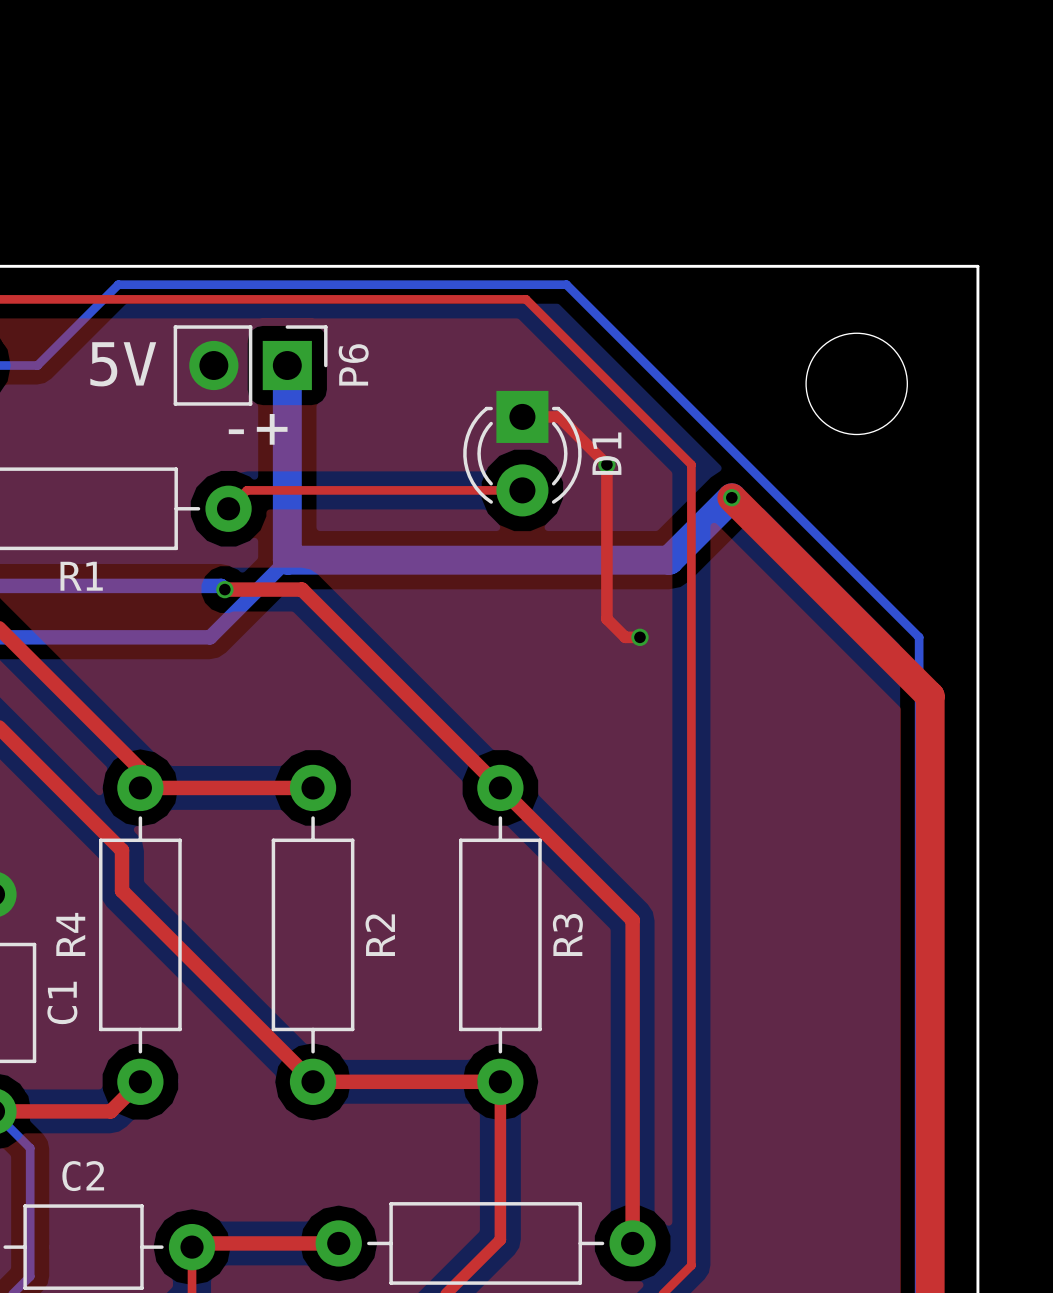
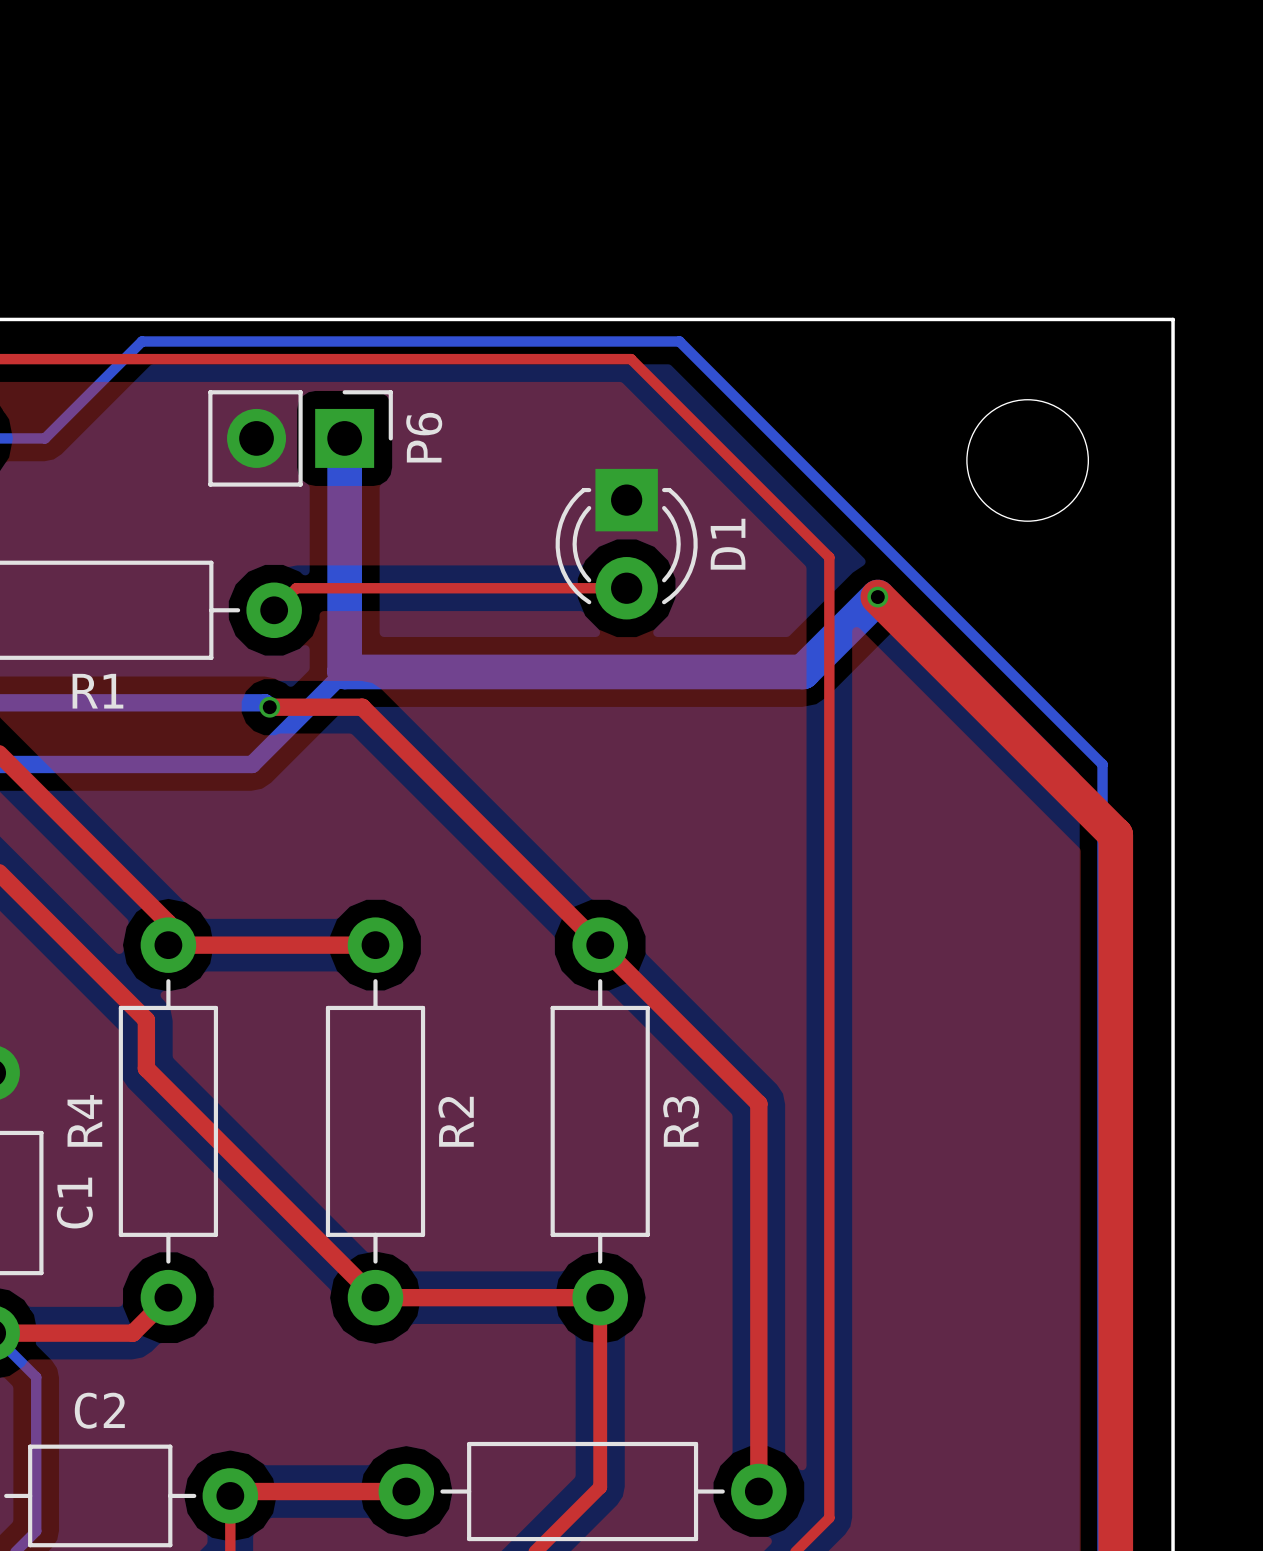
text: 5V (123, 364) -> none
top track: (522, 416) (559, 416) (606, 464) (606, 618) (625, 637) (639, 637) -> none
text: -+ (258, 429) -> none
via: (606, 464) -> none
via: (639, 637) -> none

